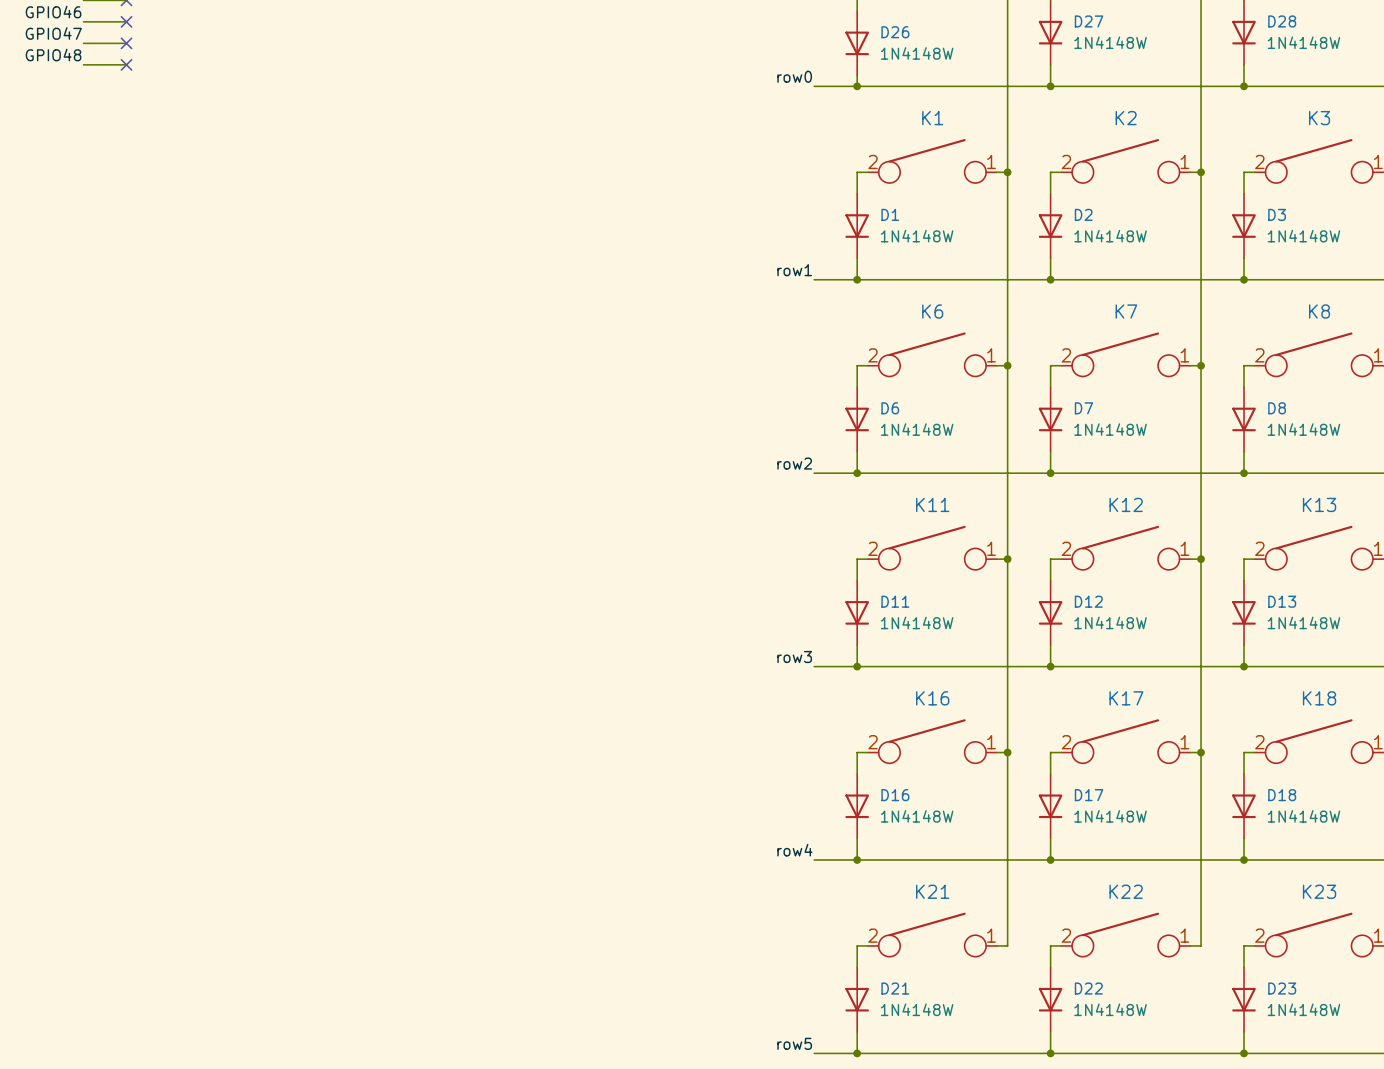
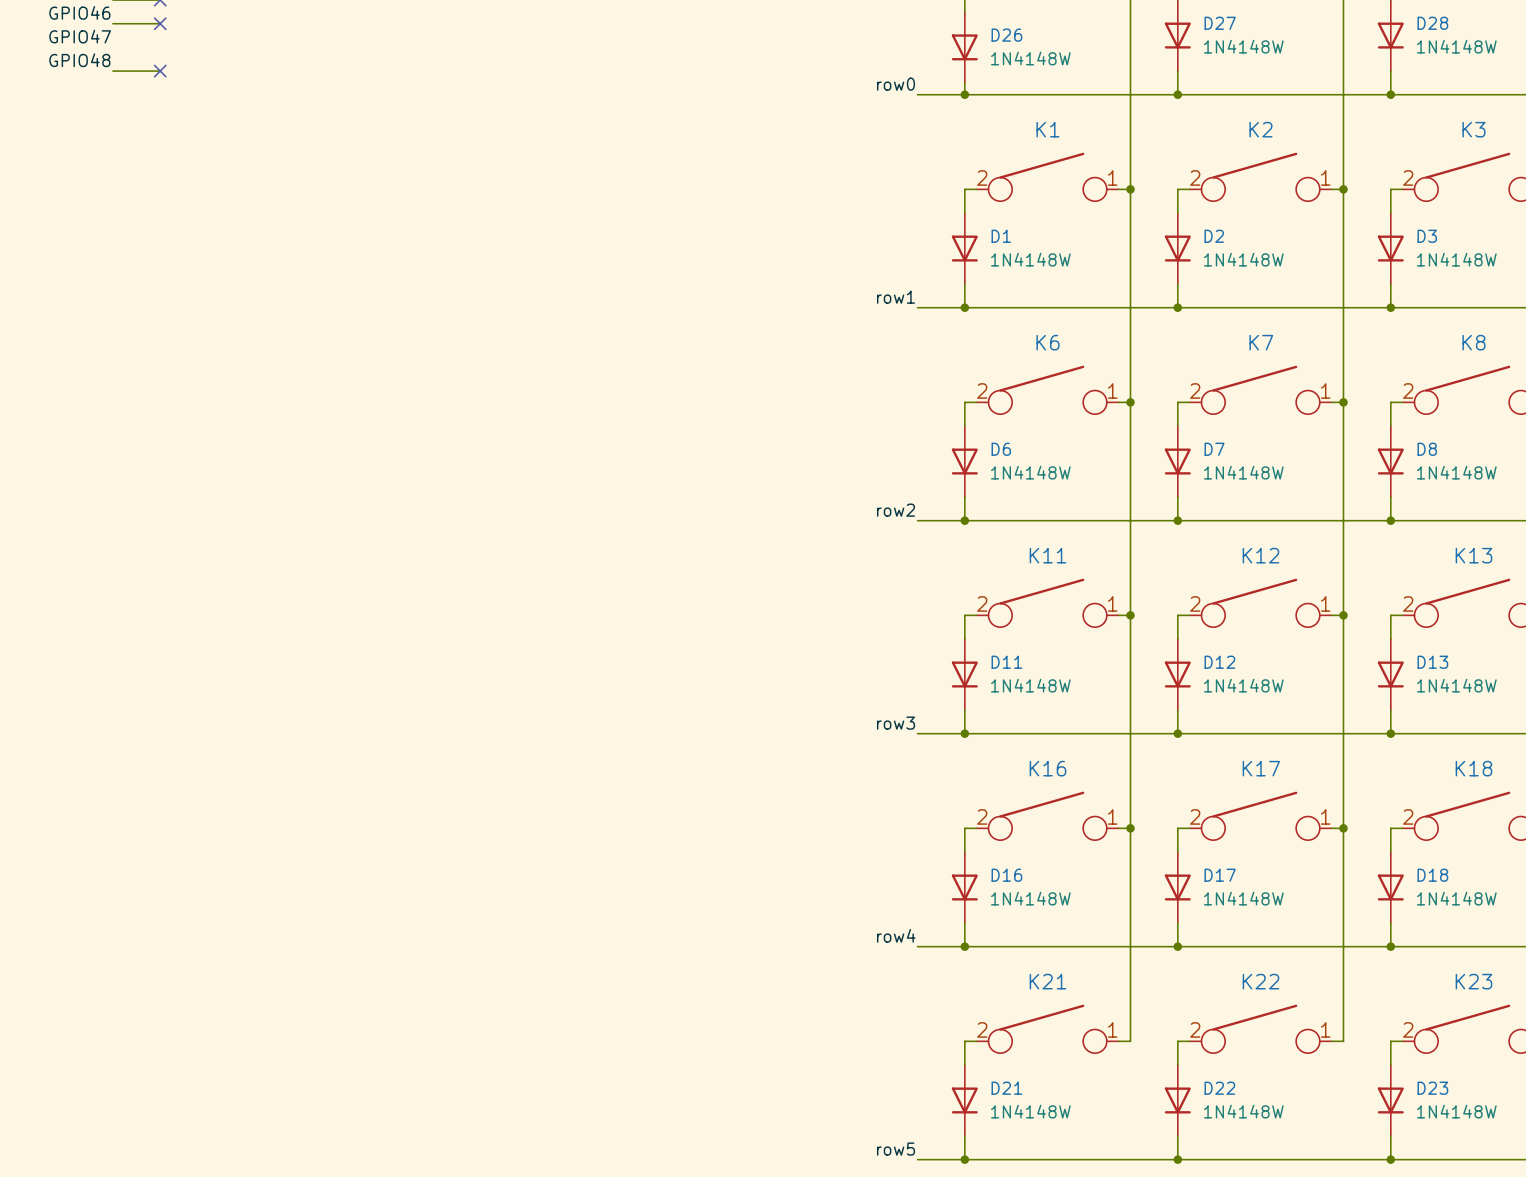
wire: (83, 43) (126, 43) -> none
no-connect mark: (126, 43) -> none

